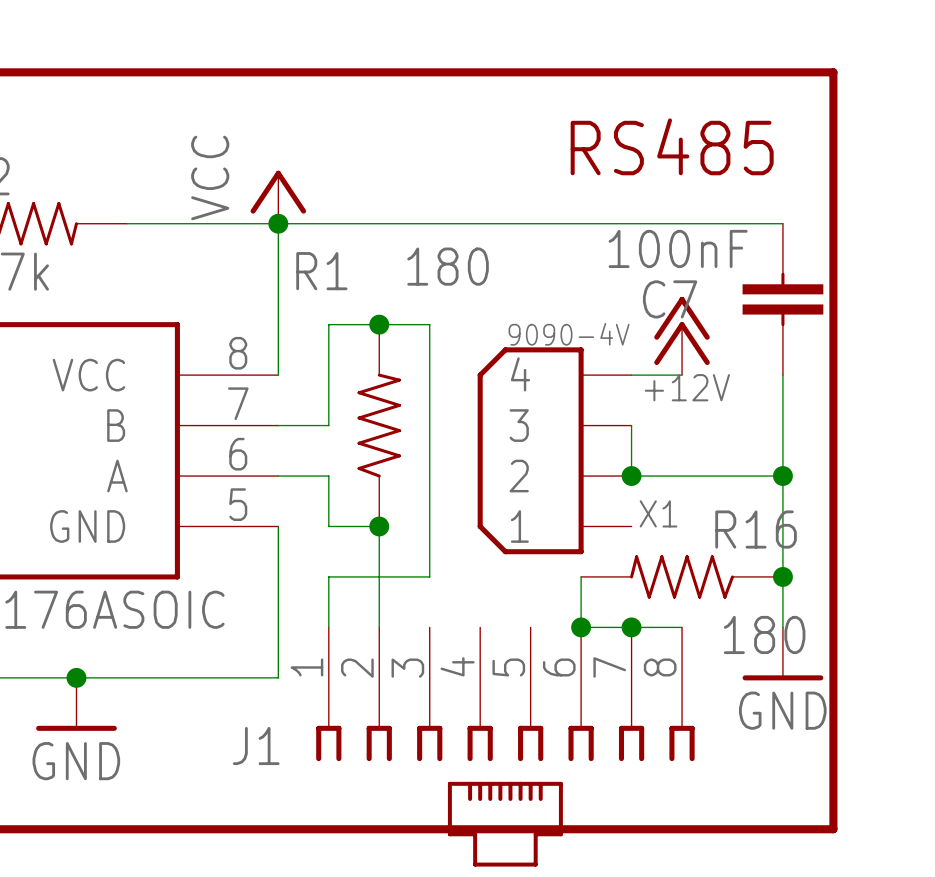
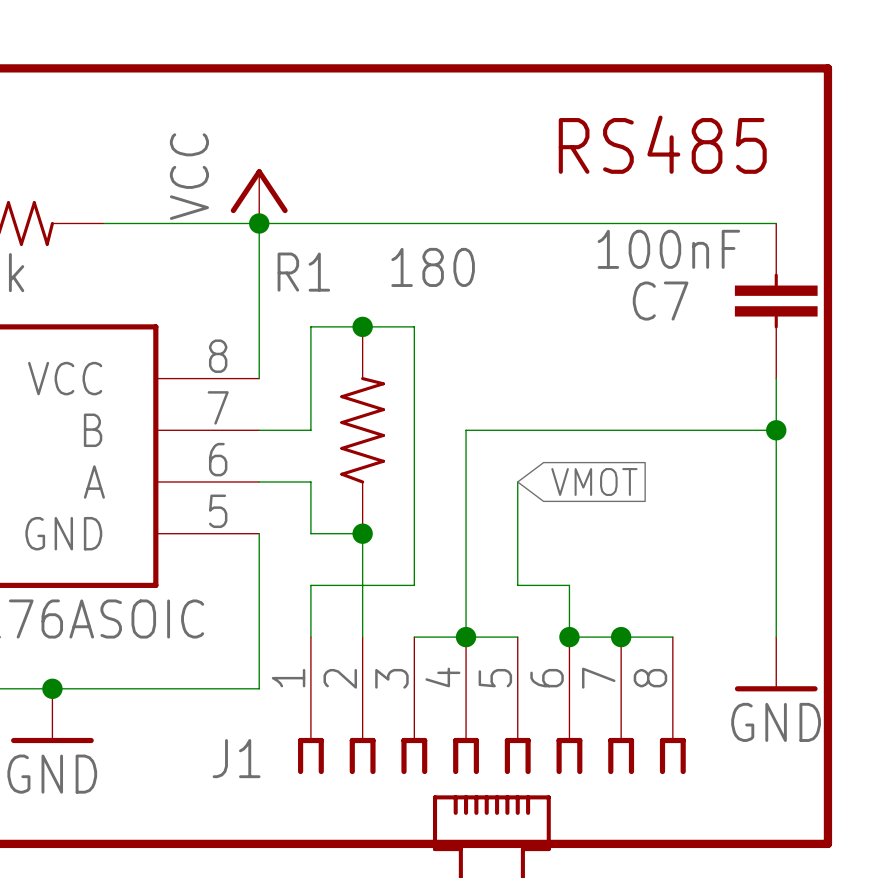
power symbol: +12V (682, 335) -> none
wire: (631, 375) (682, 375) -> none
wire: (631, 425) (631, 476) (782, 476) -> none
wire: none -> (776, 430) (466, 430) (466, 637)
X1: 9090-4V (554, 450) -> none
wire: none -> (517, 481) (517, 585) (569, 585)
global label: none -> VMOT (594, 481)
junction: (631, 476) -> none
junction position: (782, 476) -> (776, 430)
R16: 180 (682, 576) -> none
junction: (782, 576) -> none
wire: none -> (414, 637) (517, 637)
junction: none -> (466, 637)

